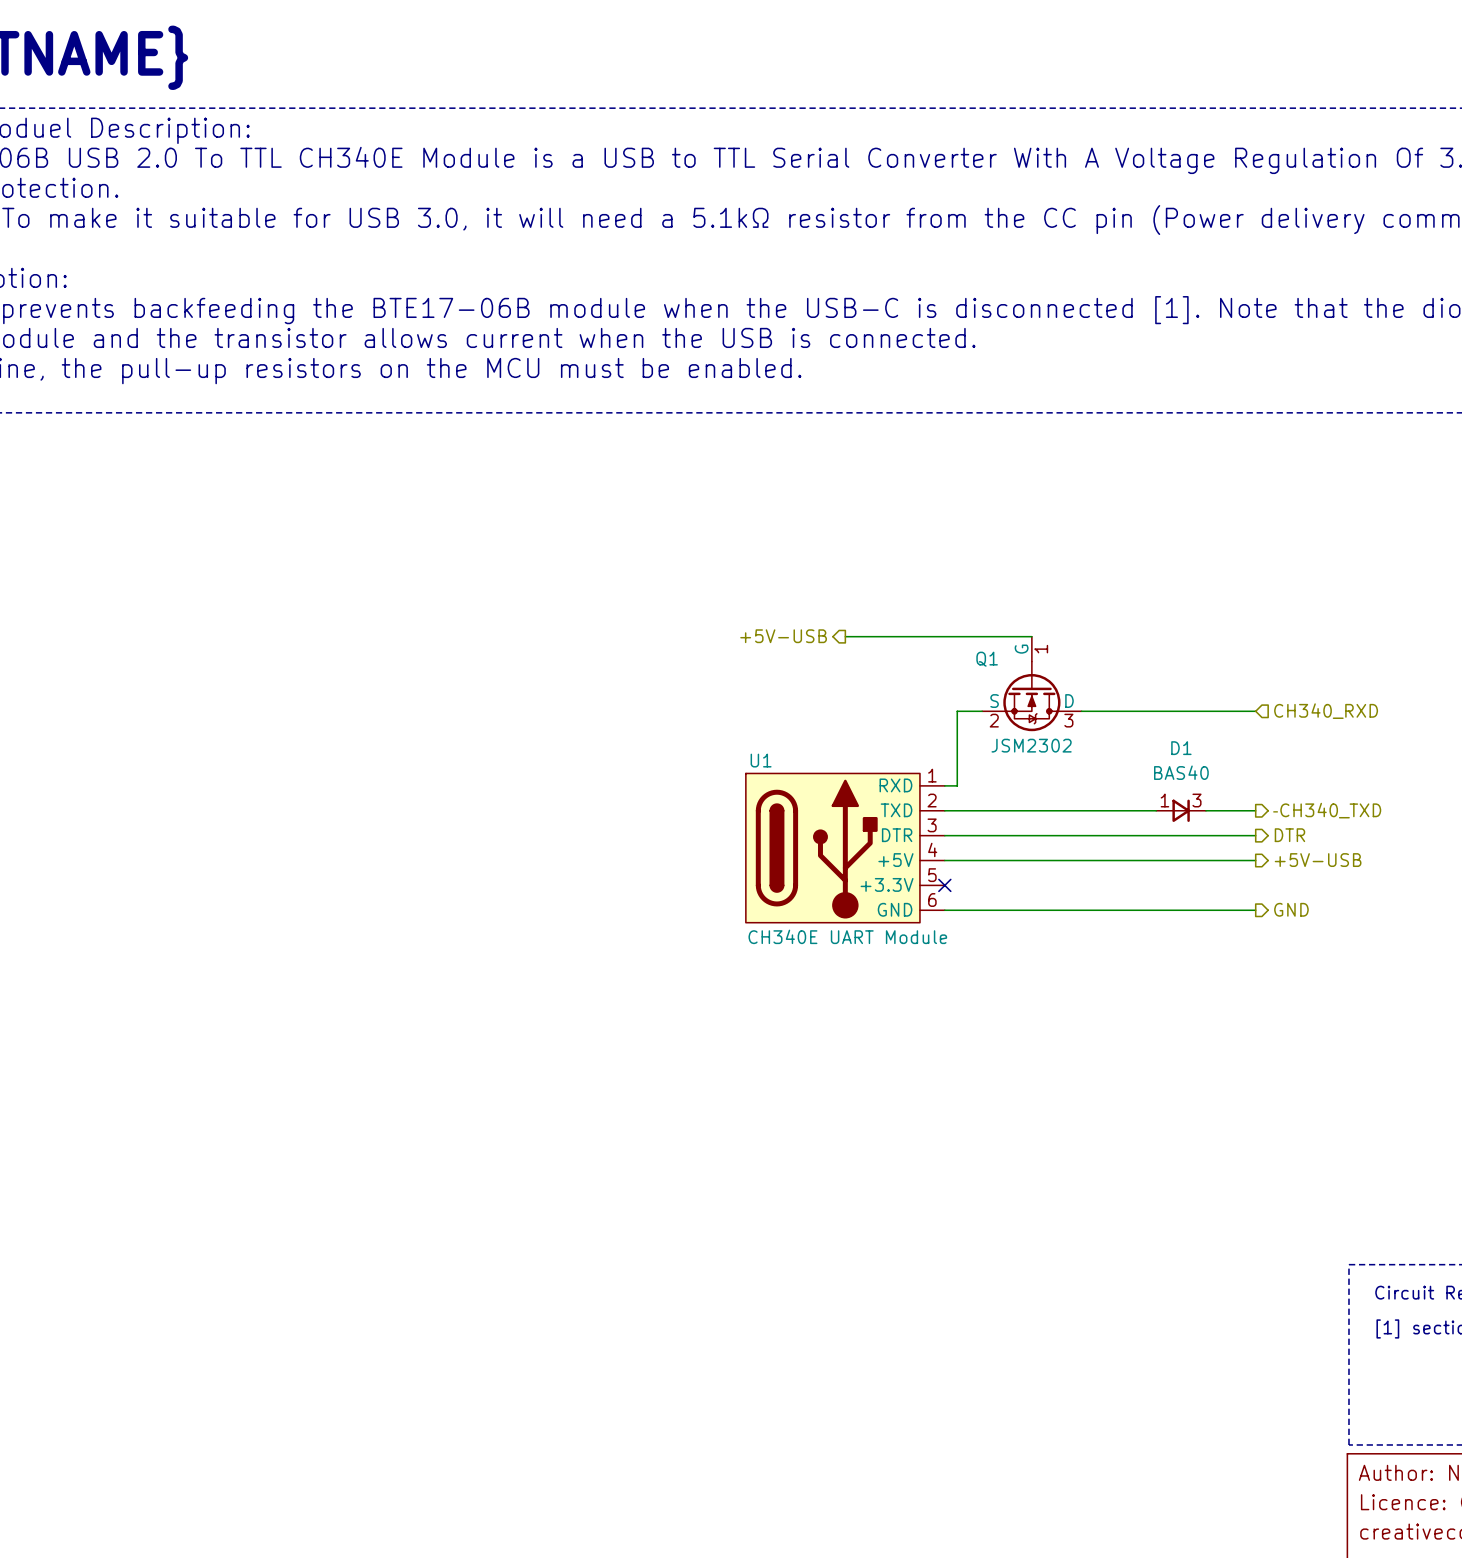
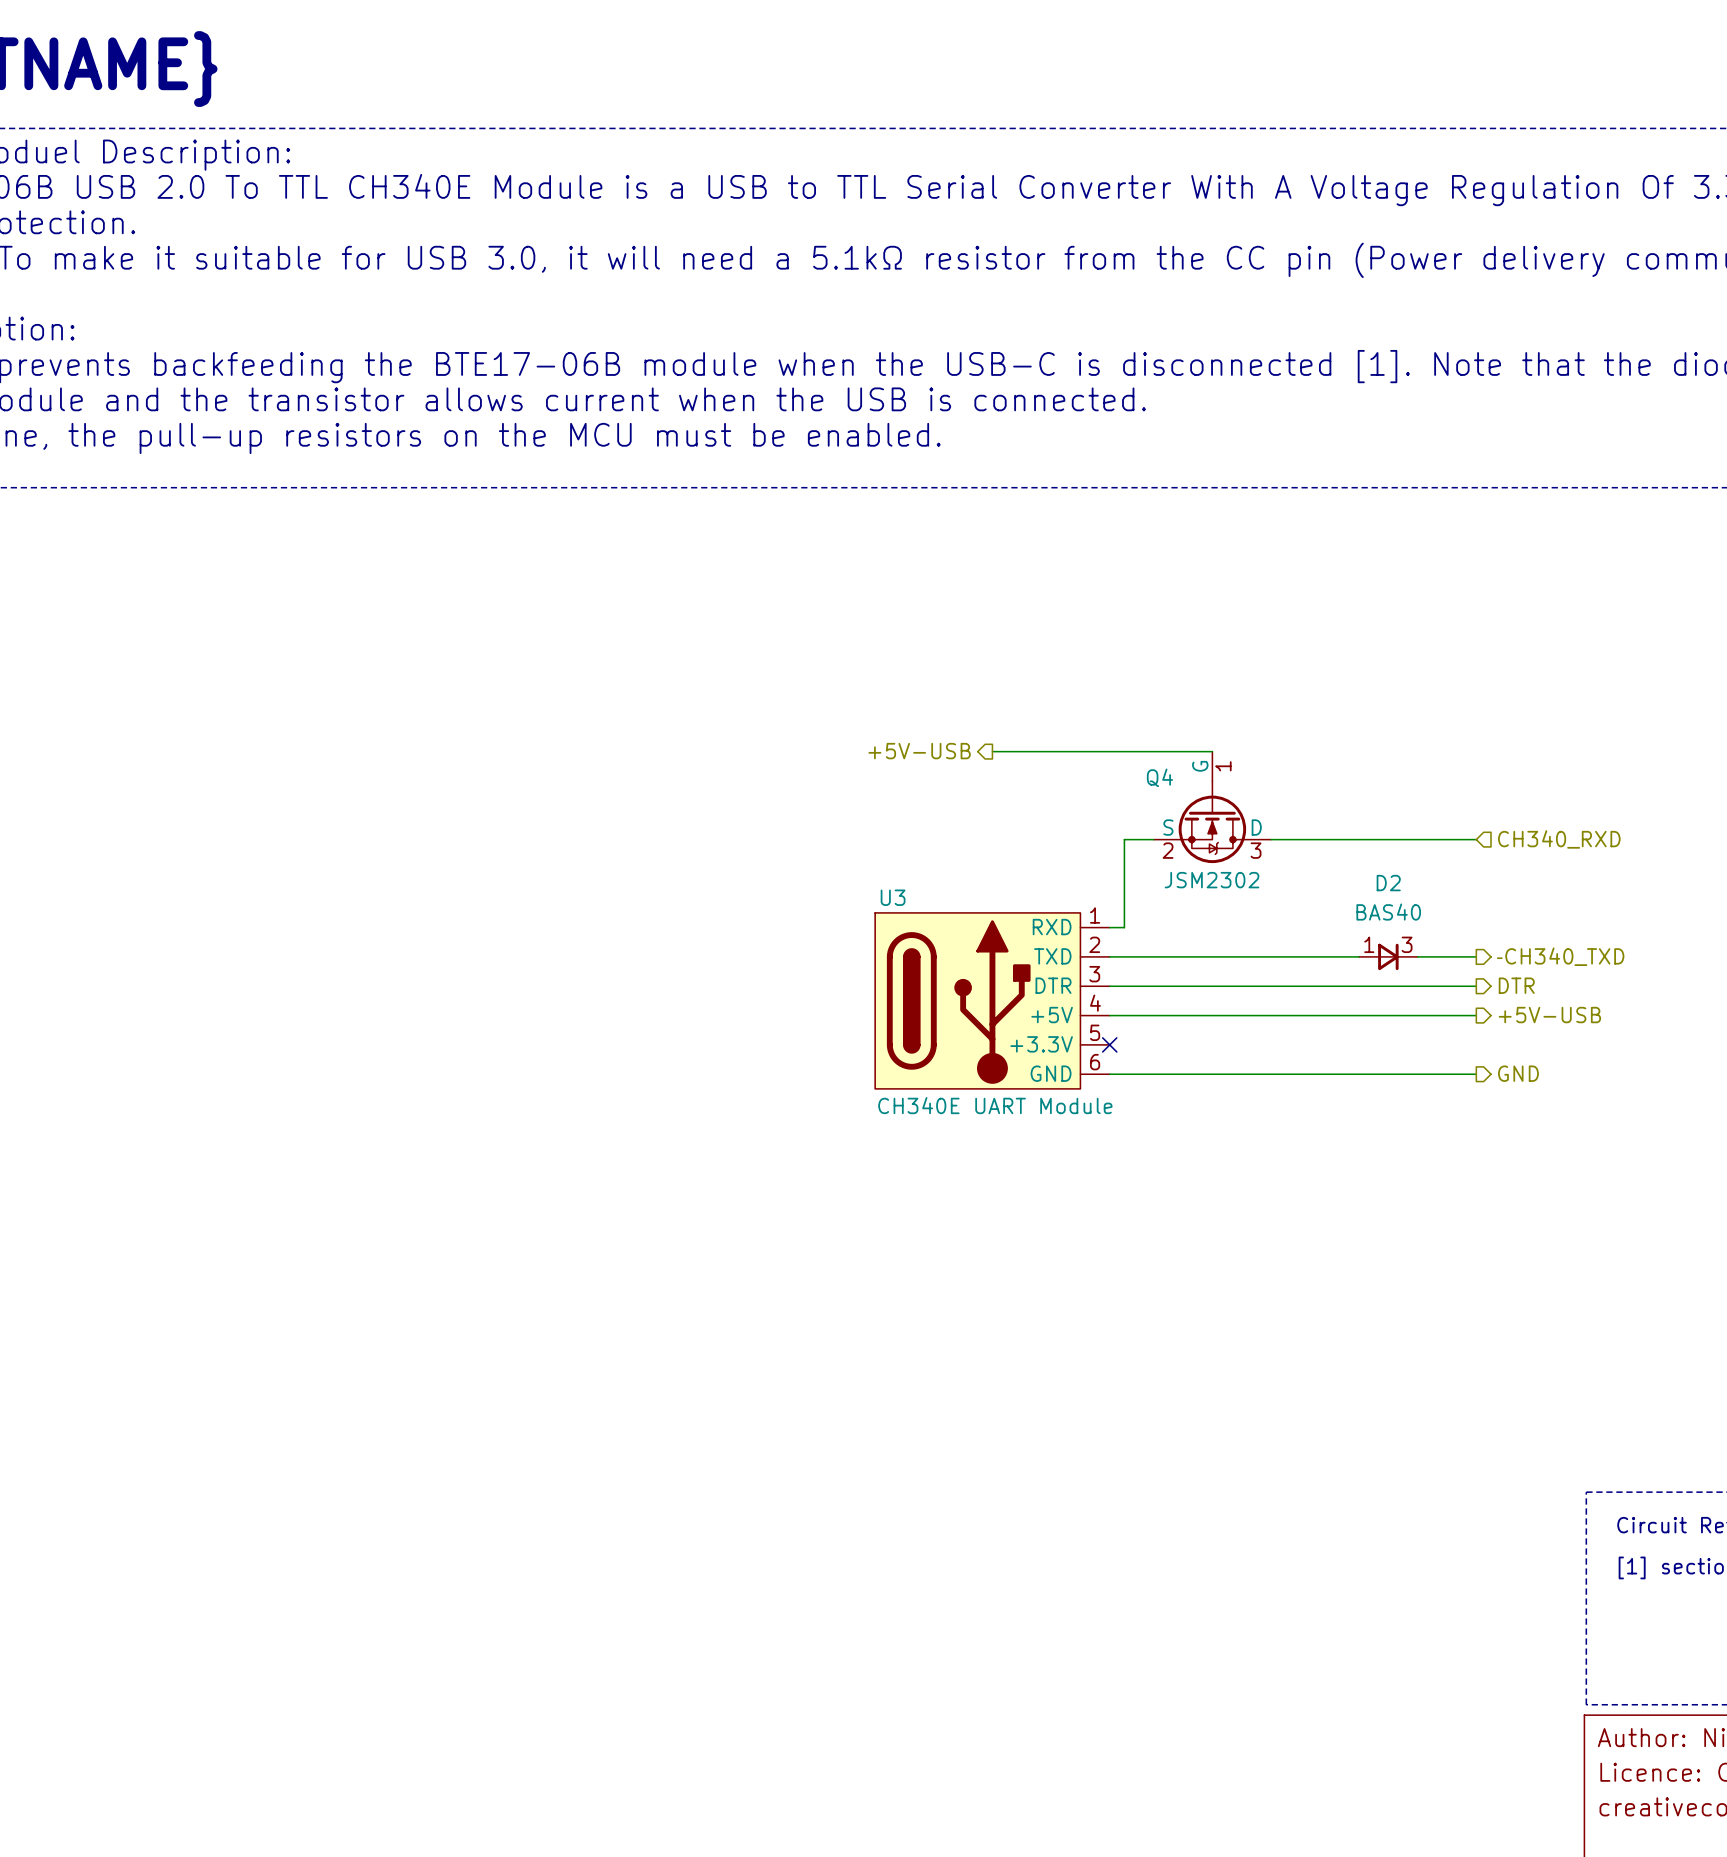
Q1 name: Q1 (987, 659) -> Q4 (1159, 777)
D1 name: D1 (1181, 748) -> D2 (1388, 883)
U1 name: U1 (761, 760) -> U3 (893, 897)

